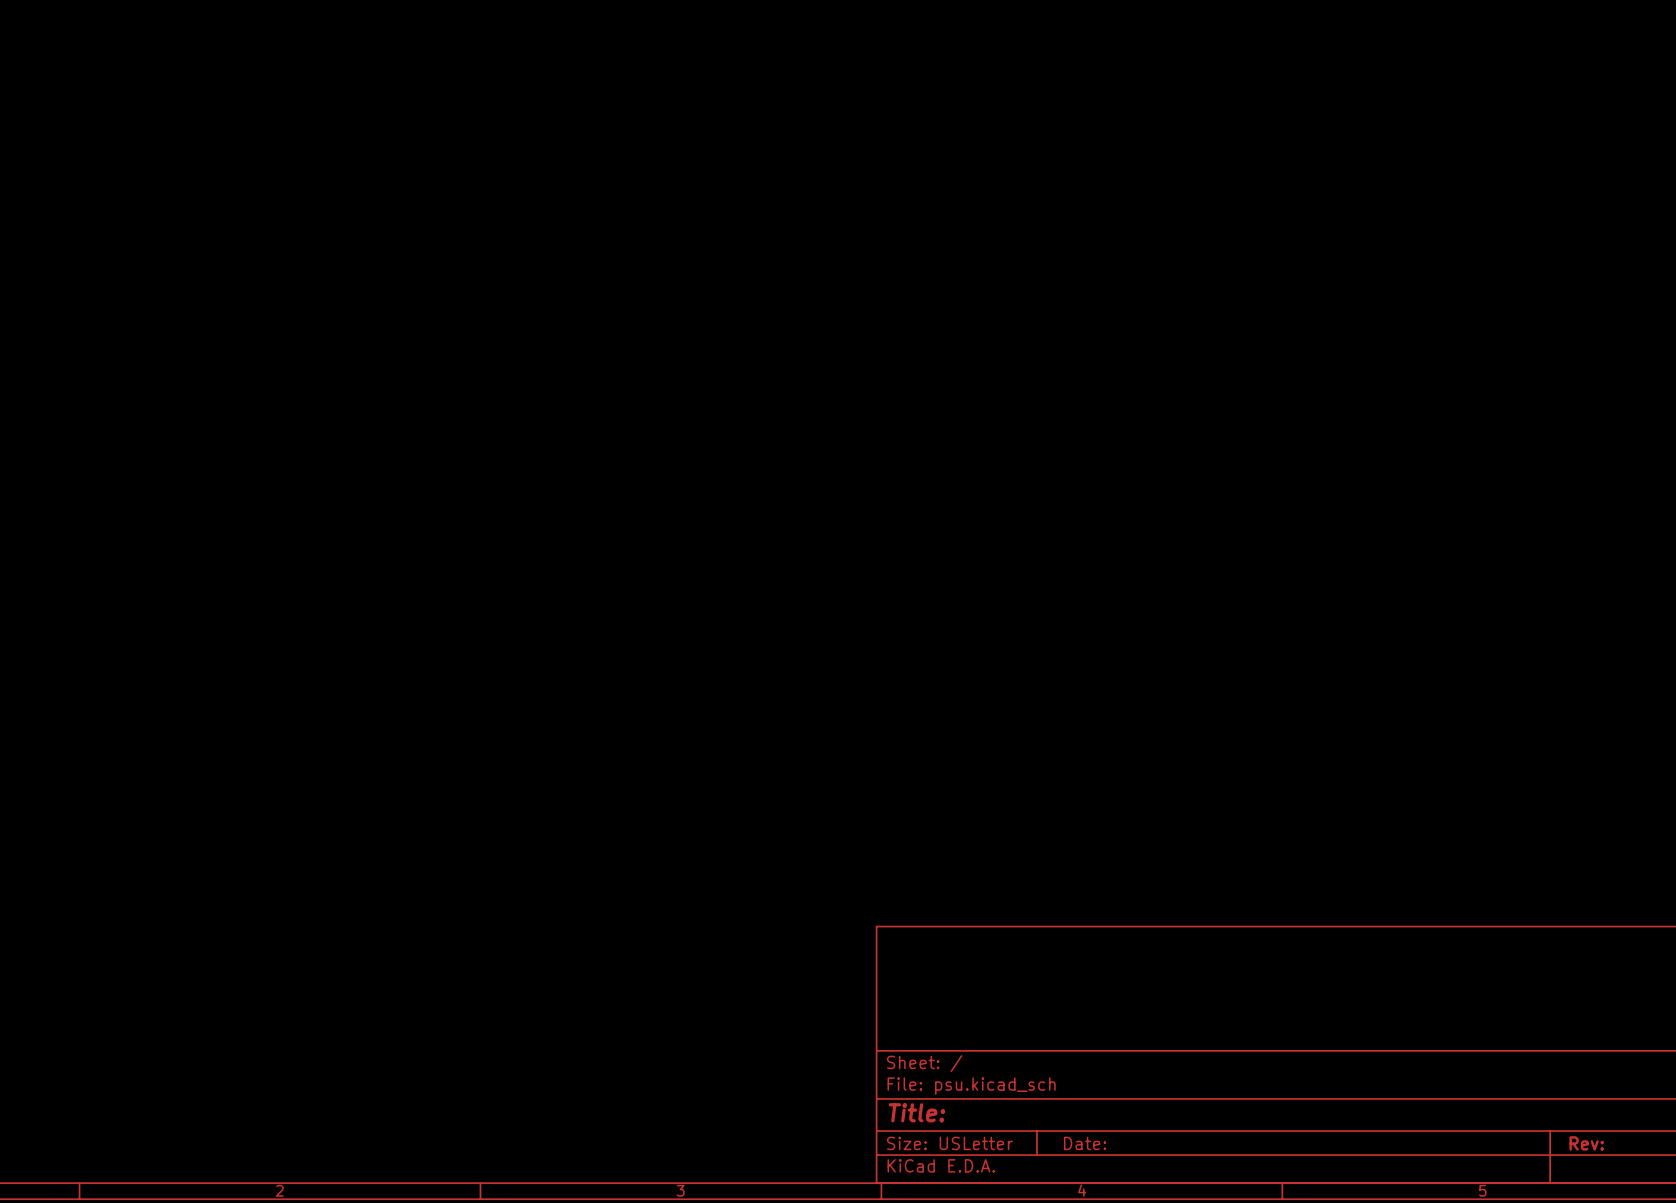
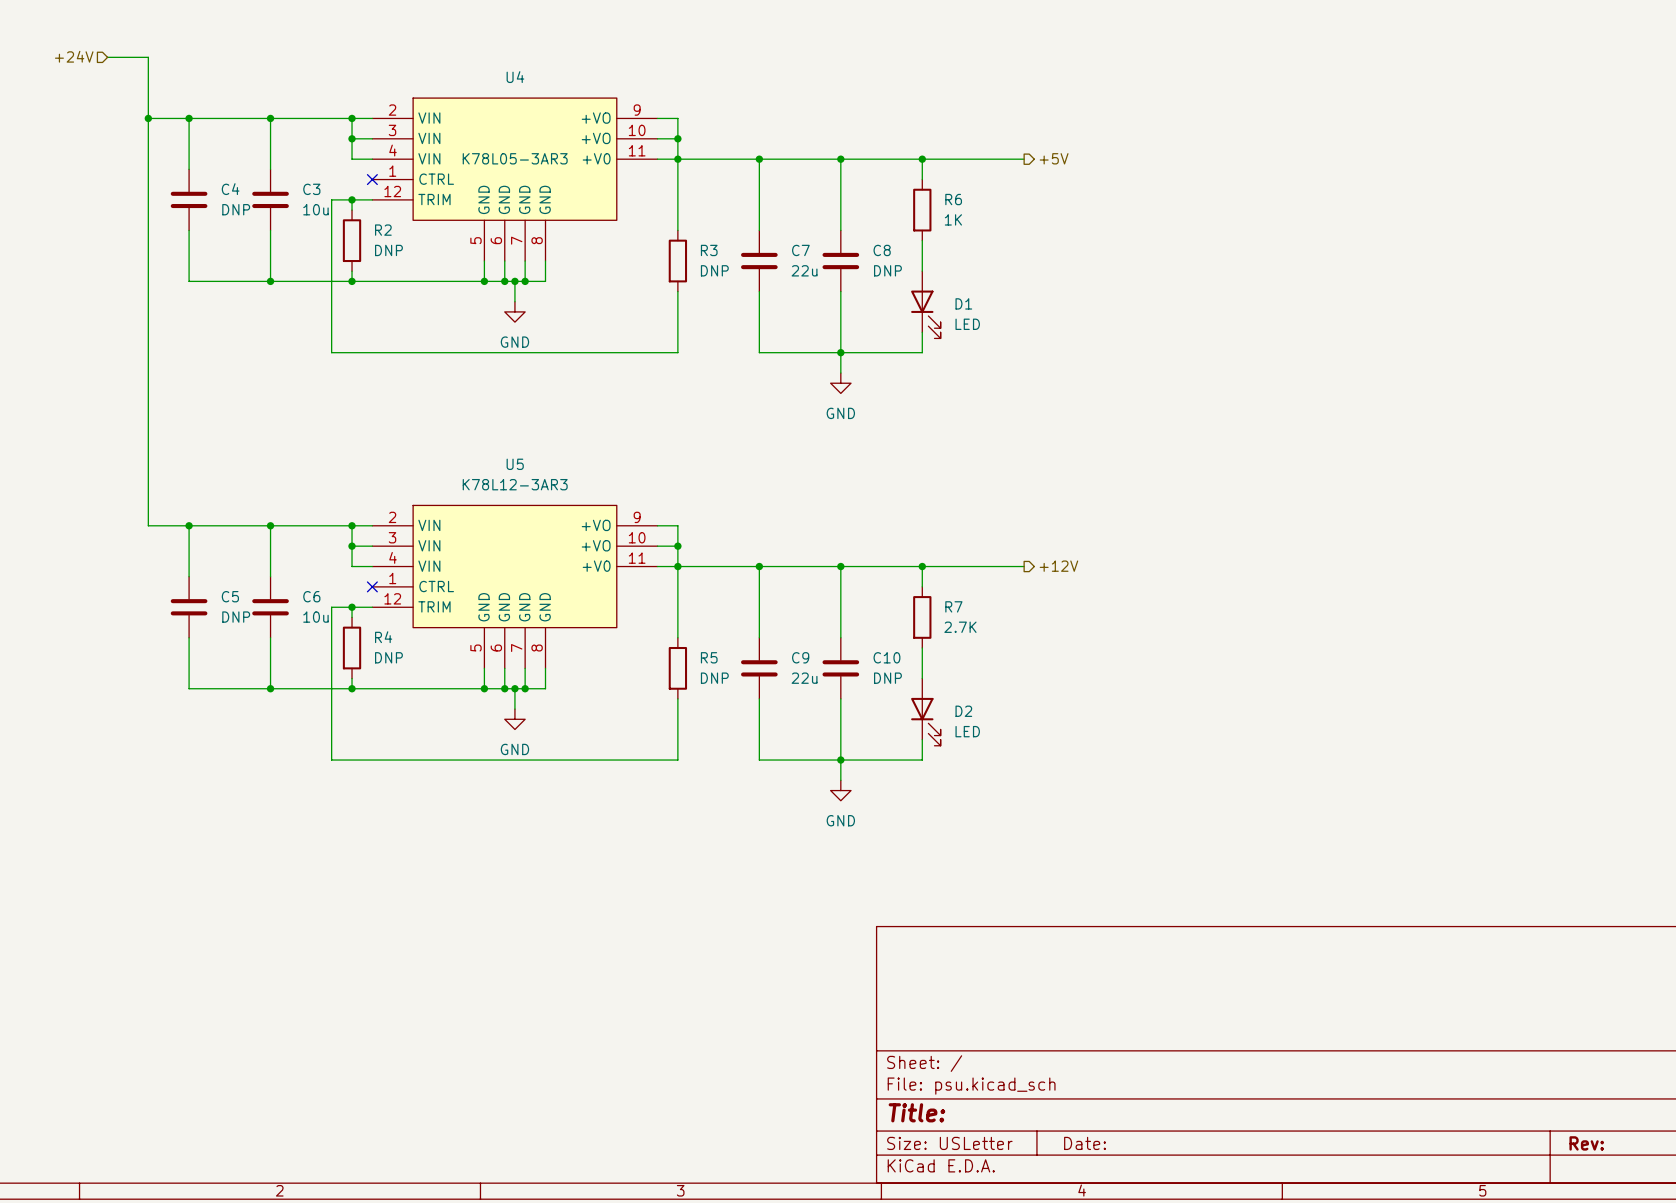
hierarchical label: none -> +24V (74, 56)
wire: none -> (107, 57) (148, 57) (148, 525) (372, 525)
wire: none -> (148, 118) (372, 118)
junction: none -> (148, 118)
wire: none -> (189, 118) (189, 169)
junction: none -> (189, 118)
wire: none -> (270, 118) (270, 169)
junction: none -> (270, 118)
wire: none -> (352, 118) (352, 159) (372, 159)
junction: none -> (352, 118)
wire: none -> (657, 118) (677, 118) (677, 230)
wire: none -> (352, 138) (372, 138)
junction: none -> (352, 138)
wire: none -> (657, 138) (677, 138)
junction: none -> (677, 138)
hierarchical label: none -> +5V (1054, 158)
wire: none -> (657, 159) (1024, 159)
junction: none -> (677, 159)
wire: none -> (759, 159) (759, 230)
junction: none -> (759, 159)
wire: none -> (840, 159) (840, 230)
junction: none -> (840, 159)
wire: none -> (922, 159) (922, 179)
junction: none -> (922, 159)
no-connect mark: none -> (372, 179)
U4: none -> K78L05-3AR3 (514, 179)
C4: none -> DNP (189, 199)
C3: none -> 10u (270, 199)
wire: none -> (352, 199) (352, 210)
junction: none -> (352, 199)
wire: none -> (372, 199) (331, 199) (331, 352) (677, 352) (677, 291)
R6: none -> 1K (922, 210)
wire: none -> (189, 230) (189, 281) (545, 281) (545, 261)
wire: none -> (270, 230) (270, 281)
R2: none -> DNP (352, 240)
wire: none -> (922, 240) (922, 271)
wire: none -> (484, 261) (484, 281)
wire: none -> (504, 261) (504, 281)
wire: none -> (525, 261) (525, 281)
R3: none -> DNP (677, 261)
C7: none -> 22u (759, 261)
C8: none -> DNP (840, 261)
wire: none -> (352, 271) (352, 281)
junction: none -> (270, 281)
junction: none -> (352, 281)
junction: none -> (484, 281)
junction: none -> (504, 281)
wire: none -> (514, 281) (514, 301)
junction: none -> (514, 281)
junction: none -> (525, 281)
wire: none -> (759, 291) (759, 352) (922, 352) (922, 332)
wire: none -> (840, 291) (840, 373)
D1: none -> LED (925, 304)
power symbol: none -> GND (514, 311)
junction: none -> (840, 352)
power symbol: none -> GND (840, 383)
wire: none -> (189, 525) (189, 576)
junction: none -> (189, 525)
wire: none -> (270, 525) (270, 576)
junction: none -> (270, 525)
wire: none -> (352, 525) (352, 566) (372, 566)
junction: none -> (352, 525)
wire: none -> (657, 525) (677, 525) (677, 637)
wire: none -> (352, 546) (372, 546)
junction: none -> (352, 546)
wire: none -> (657, 546) (677, 546)
junction: none -> (677, 546)
wire: none -> (657, 566) (1024, 566)
junction: none -> (677, 566)
wire: none -> (759, 566) (759, 637)
junction: none -> (759, 566)
wire: none -> (840, 566) (840, 637)
junction: none -> (840, 566)
wire: none -> (922, 566) (922, 586)
junction: none -> (922, 566)
hierarchical label: none -> +12V (1058, 566)
no-connect mark: none -> (372, 586)
U5: none -> K78L12-3AR3 (514, 586)
C5: none -> DNP (189, 607)
C6: none -> 10u (270, 607)
wire: none -> (352, 607) (352, 617)
junction: none -> (352, 607)
wire: none -> (372, 607) (331, 607) (331, 760) (677, 760) (677, 698)
R7: none -> 2.7K (922, 617)
wire: none -> (189, 637) (189, 688) (545, 688) (545, 668)
wire: none -> (270, 637) (270, 688)
R4: none -> DNP (352, 648)
wire: none -> (922, 648) (922, 678)
wire: none -> (484, 668) (484, 688)
wire: none -> (504, 668) (504, 688)
wire: none -> (525, 668) (525, 688)
R5: none -> DNP (677, 668)
C9: none -> 22u (759, 668)
C10: none -> DNP (840, 668)
wire: none -> (352, 678) (352, 688)
junction: none -> (270, 688)
junction: none -> (352, 688)
junction: none -> (484, 688)
junction: none -> (504, 688)
wire: none -> (514, 688) (514, 709)
junction: none -> (514, 688)
junction: none -> (525, 688)
wire: none -> (759, 698) (759, 760) (922, 760) (922, 739)
wire: none -> (840, 698) (840, 780)
D2: none -> LED (925, 712)
power symbol: none -> GND (514, 719)
junction: none -> (840, 760)
power symbol: none -> GND (840, 790)

